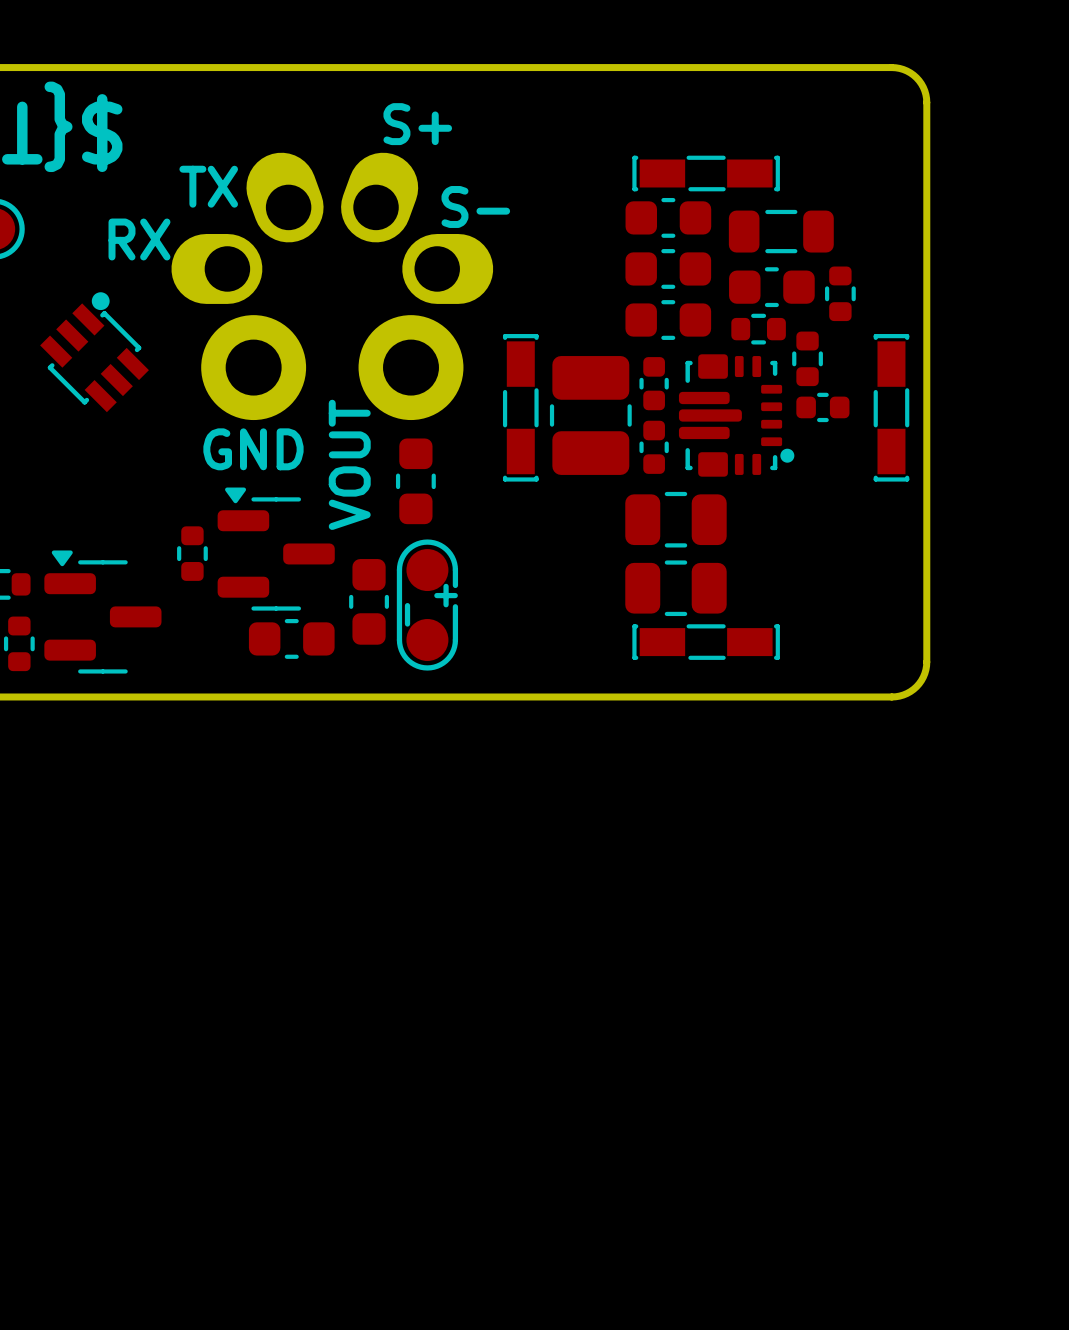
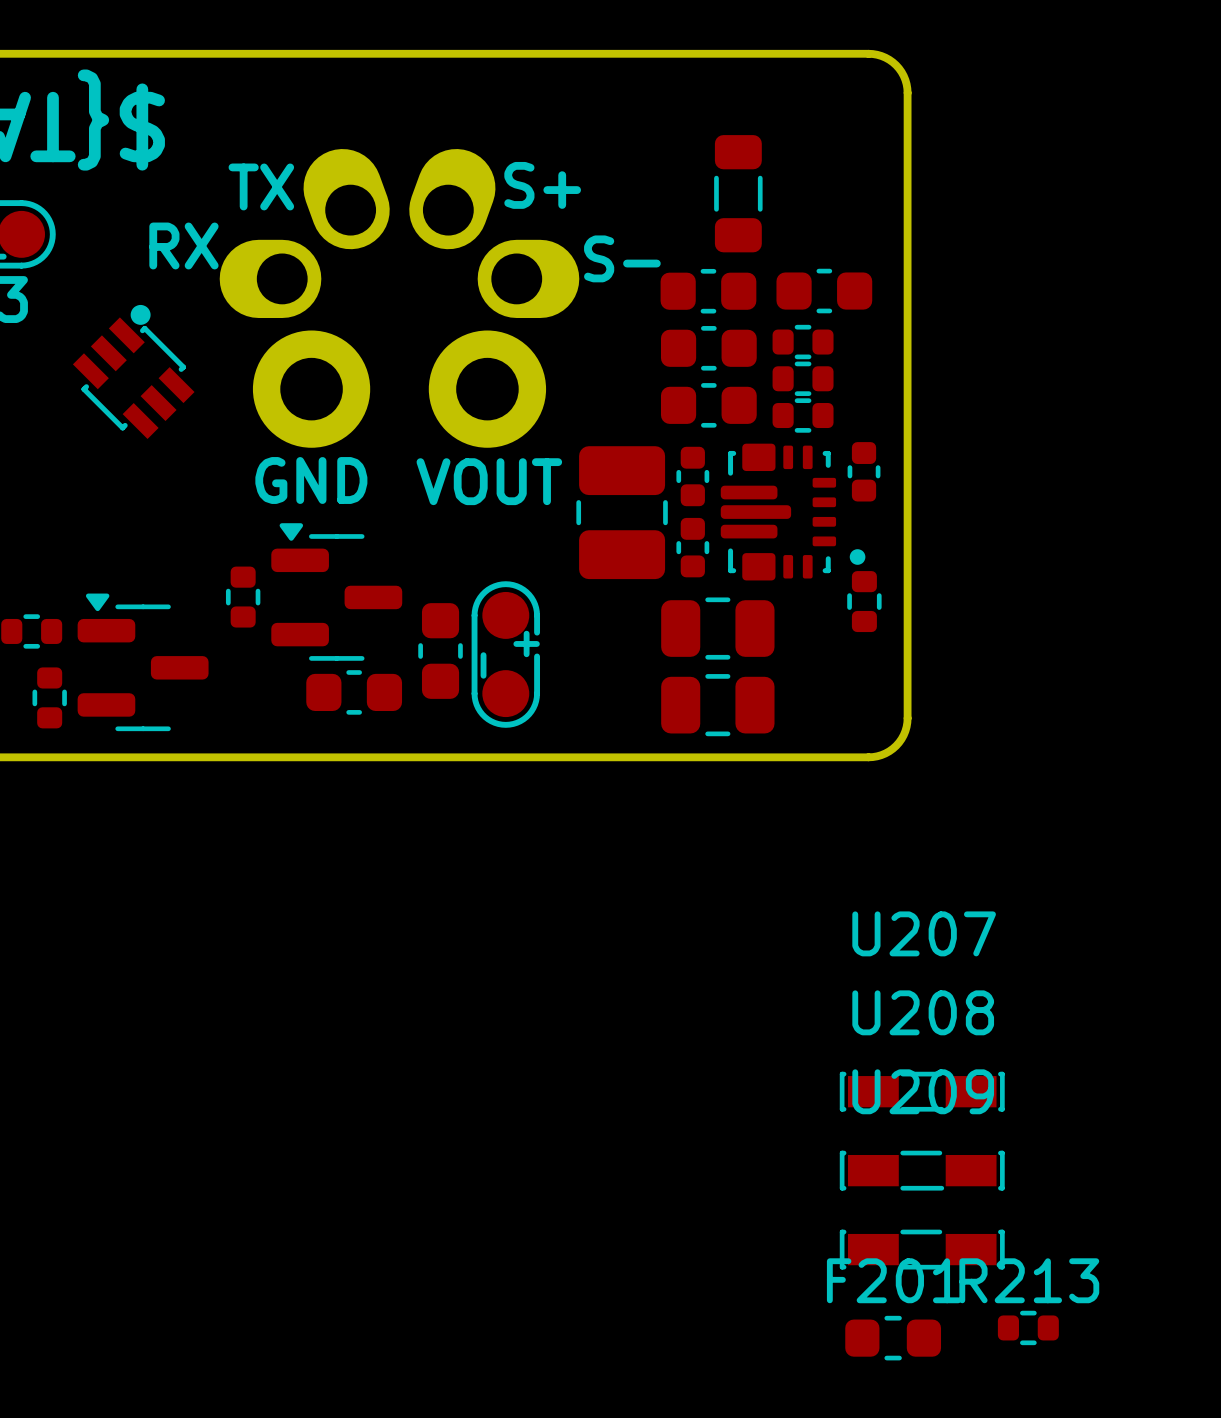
board edge: (751, 67) (899, 68) (910, 72) (919, 80) (924, 90) (926, 102) (926, 662) (924, 673) (913, 689) (895, 696) (751, 696) -> (868, 53) (881, 55) (896, 65) (903, 75) (907, 92) (907, 722) (901, 739) (892, 748) (881, 755) (868, 757)
text position: S+ (417, 124) -> S+ (542, 185)
part: (706, 173) -> none
text position: S- (475, 206) -> S- (622, 258)
part: (668, 217) -> none
part rotation: 0° (781, 231) -> 90° clockwise (738, 193)
part position: (781, 231) -> (738, 193)
part: (668, 268) -> none
part: none -> (708, 291)
part: none -> (824, 291)
part: (771, 287) -> none
part: (840, 293) -> none
part: (668, 320) -> none
part: none -> (803, 342)
part: (758, 329) -> none
part: none -> (708, 348)
part: none -> (803, 378)
part: (807, 358) -> none
part: none -> (708, 405)
part: (654, 383) -> none
part: none -> (803, 415)
part: (520, 407) -> none
part: (822, 407) -> none
part: (891, 407) -> none
part position: (590, 415) -> (622, 512)
part: (736, 415) -> none
part: none -> (864, 471)
part: none -> (692, 476)
part: (654, 447) -> none
text rotation: 0° (349, 464) -> 90° clockwise (489, 481)
part: none -> (793, 512)
part: (415, 481) -> none
part: none -> (692, 547)
part: (675, 519) -> none
part: none -> (864, 601)
part: none -> (717, 628)
part: (675, 588) -> none
part: (706, 642) -> none
part: none -> (717, 705)
U207: none -> (922, 1091)
U208: none -> (922, 1170)
U209: none -> (922, 1249)
R213: none -> (1028, 1327)
F201: none -> (893, 1338)

